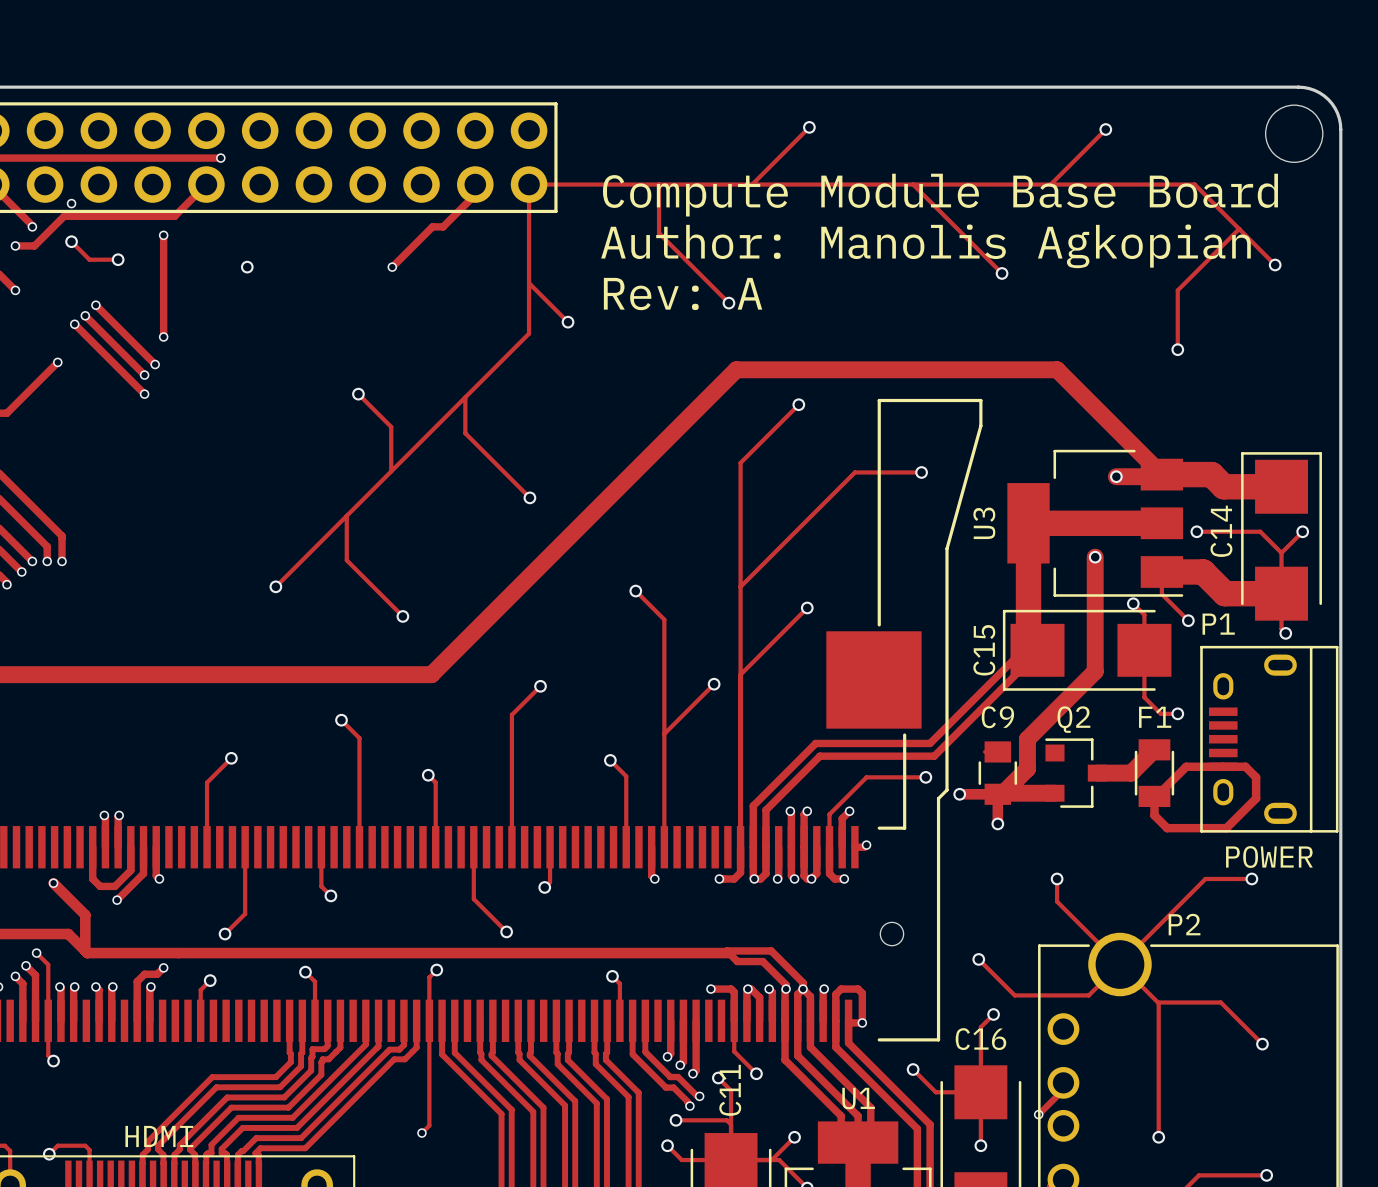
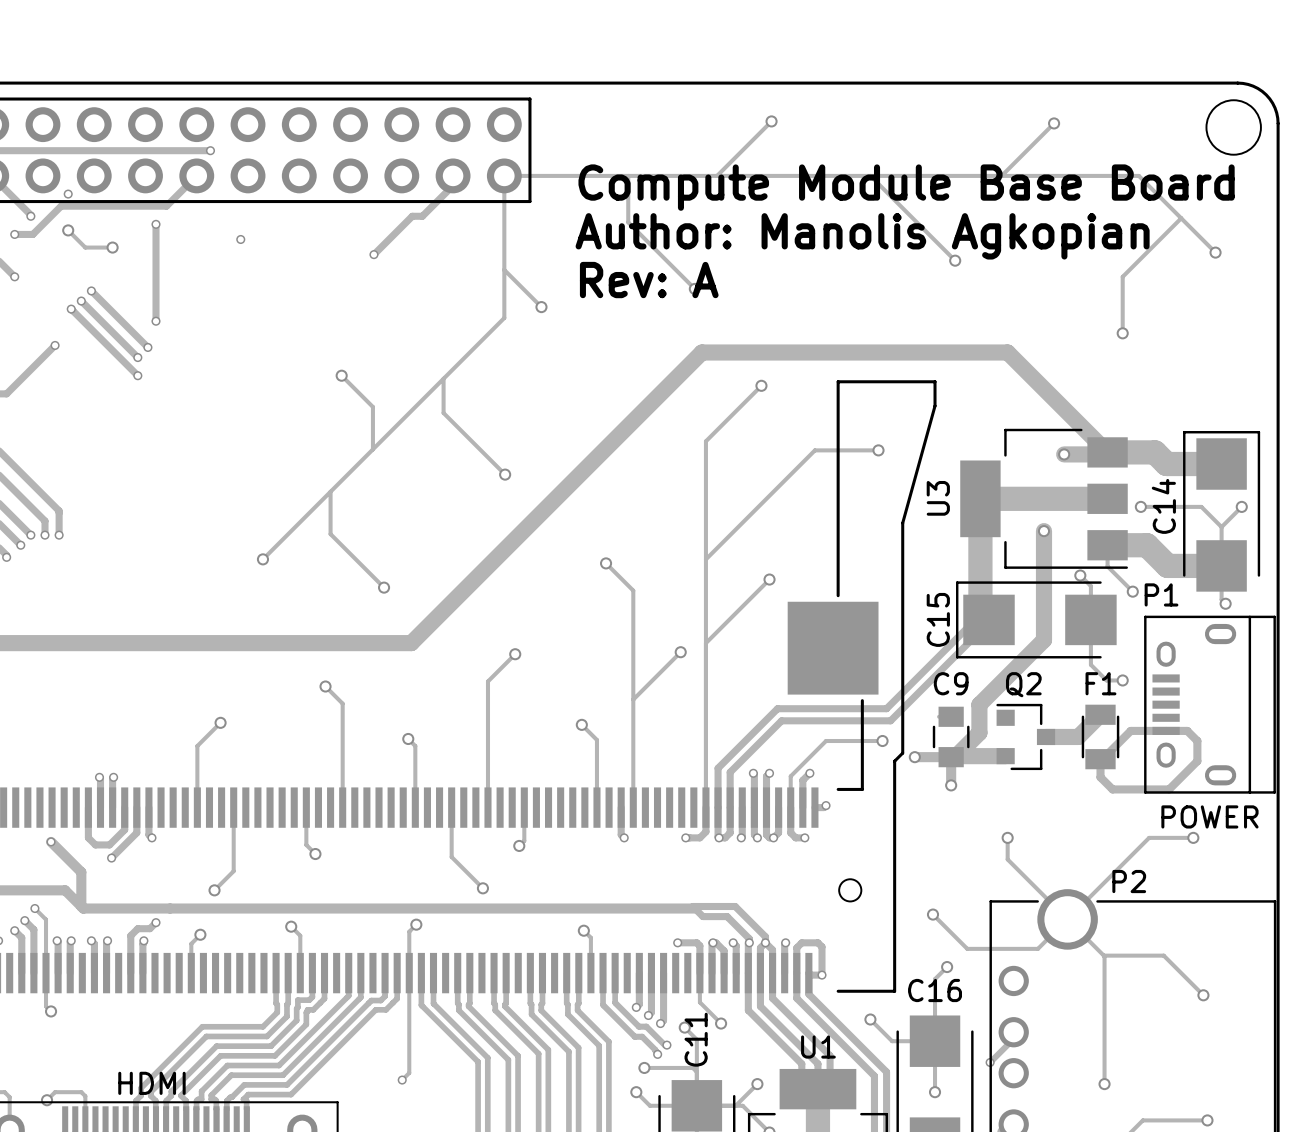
via: none -> (240, 239)
via: (247, 267) -> none

